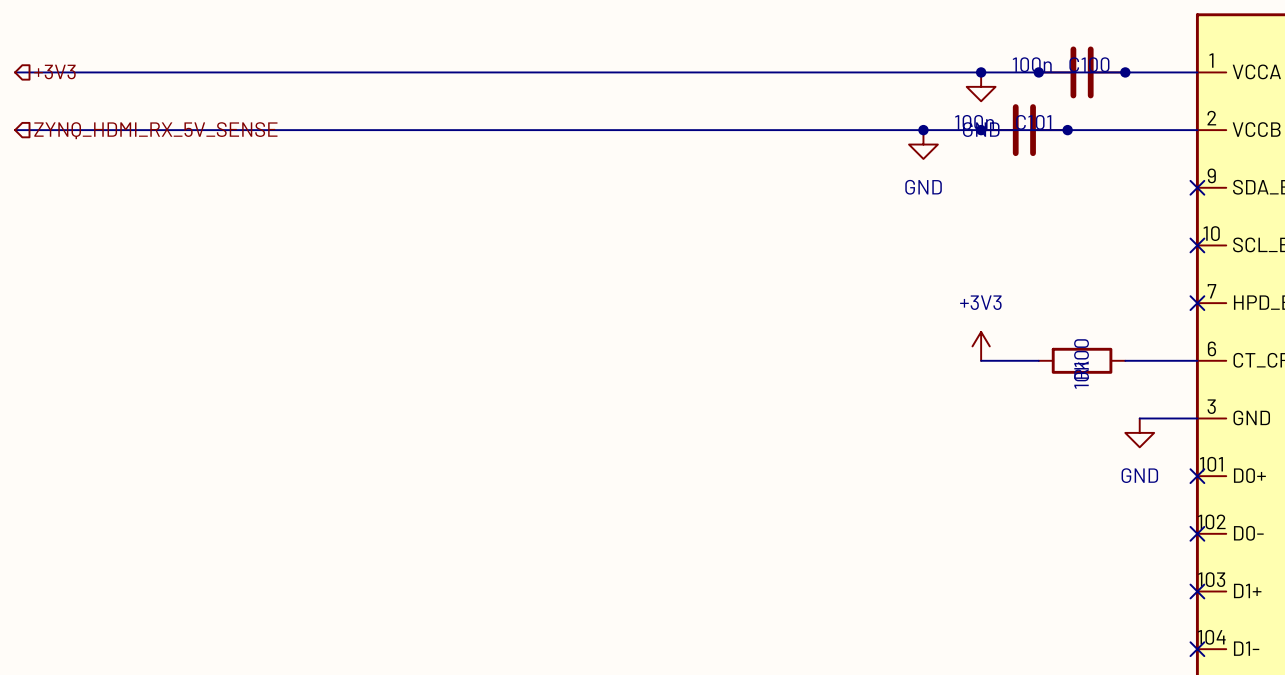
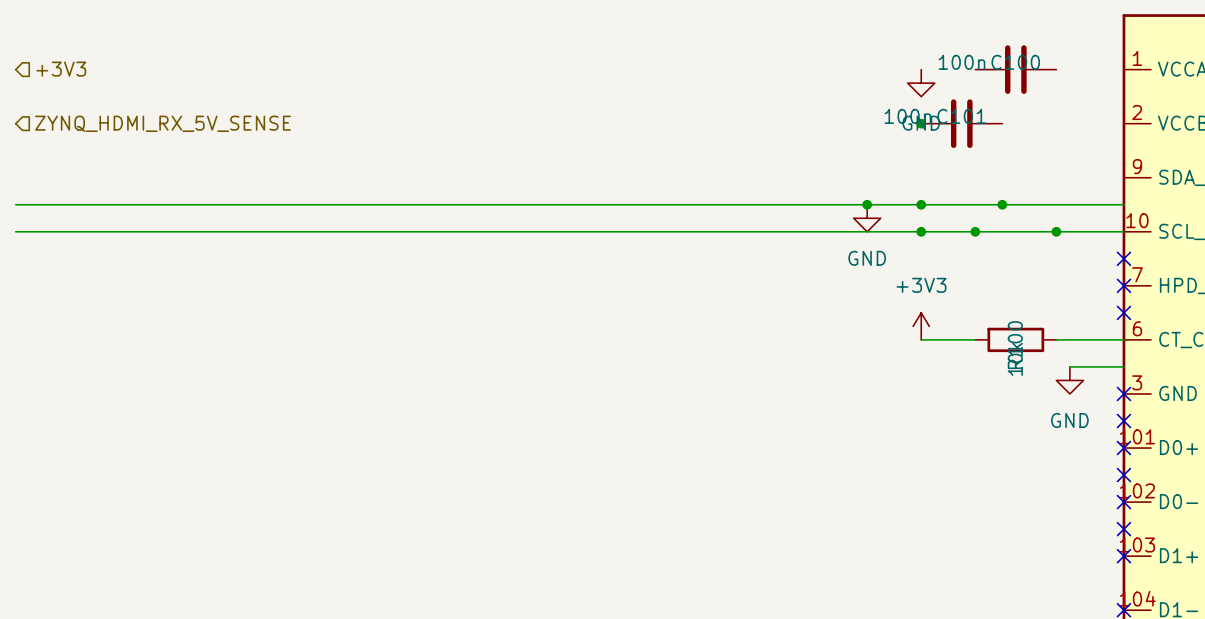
wire: (15, 72) (1197, 72) -> (15, 231) (1123, 231)
junction: (981, 72) -> none
junction: (1038, 72) -> none
junction: (1125, 72) -> none
wire: (15, 130) (1197, 130) -> (15, 204) (1123, 204)
junction: (923, 130) -> none
junction: (1067, 130) -> none
power symbol position: GND (923, 144) -> GND (867, 218)
no-connect mark: (1197, 187) -> none
junction: none -> (867, 204)
junction: none -> (921, 204)
junction: none -> (1002, 204)
junction: none -> (921, 231)
junction: none -> (975, 231)
junction: none -> (1056, 231)
no-connect mark position: (1197, 245) -> (1123, 258)
no-connect mark: none -> (1123, 312)
wire: (1139, 418) (1197, 418) -> (1069, 366) (1123, 366)
no-connect mark: none -> (1123, 393)
power symbol position: GND (1139, 432) -> GND (1069, 380)
no-connect mark: none -> (1123, 421)
no-connect mark: none -> (1123, 475)
no-connect mark: none -> (1123, 529)

